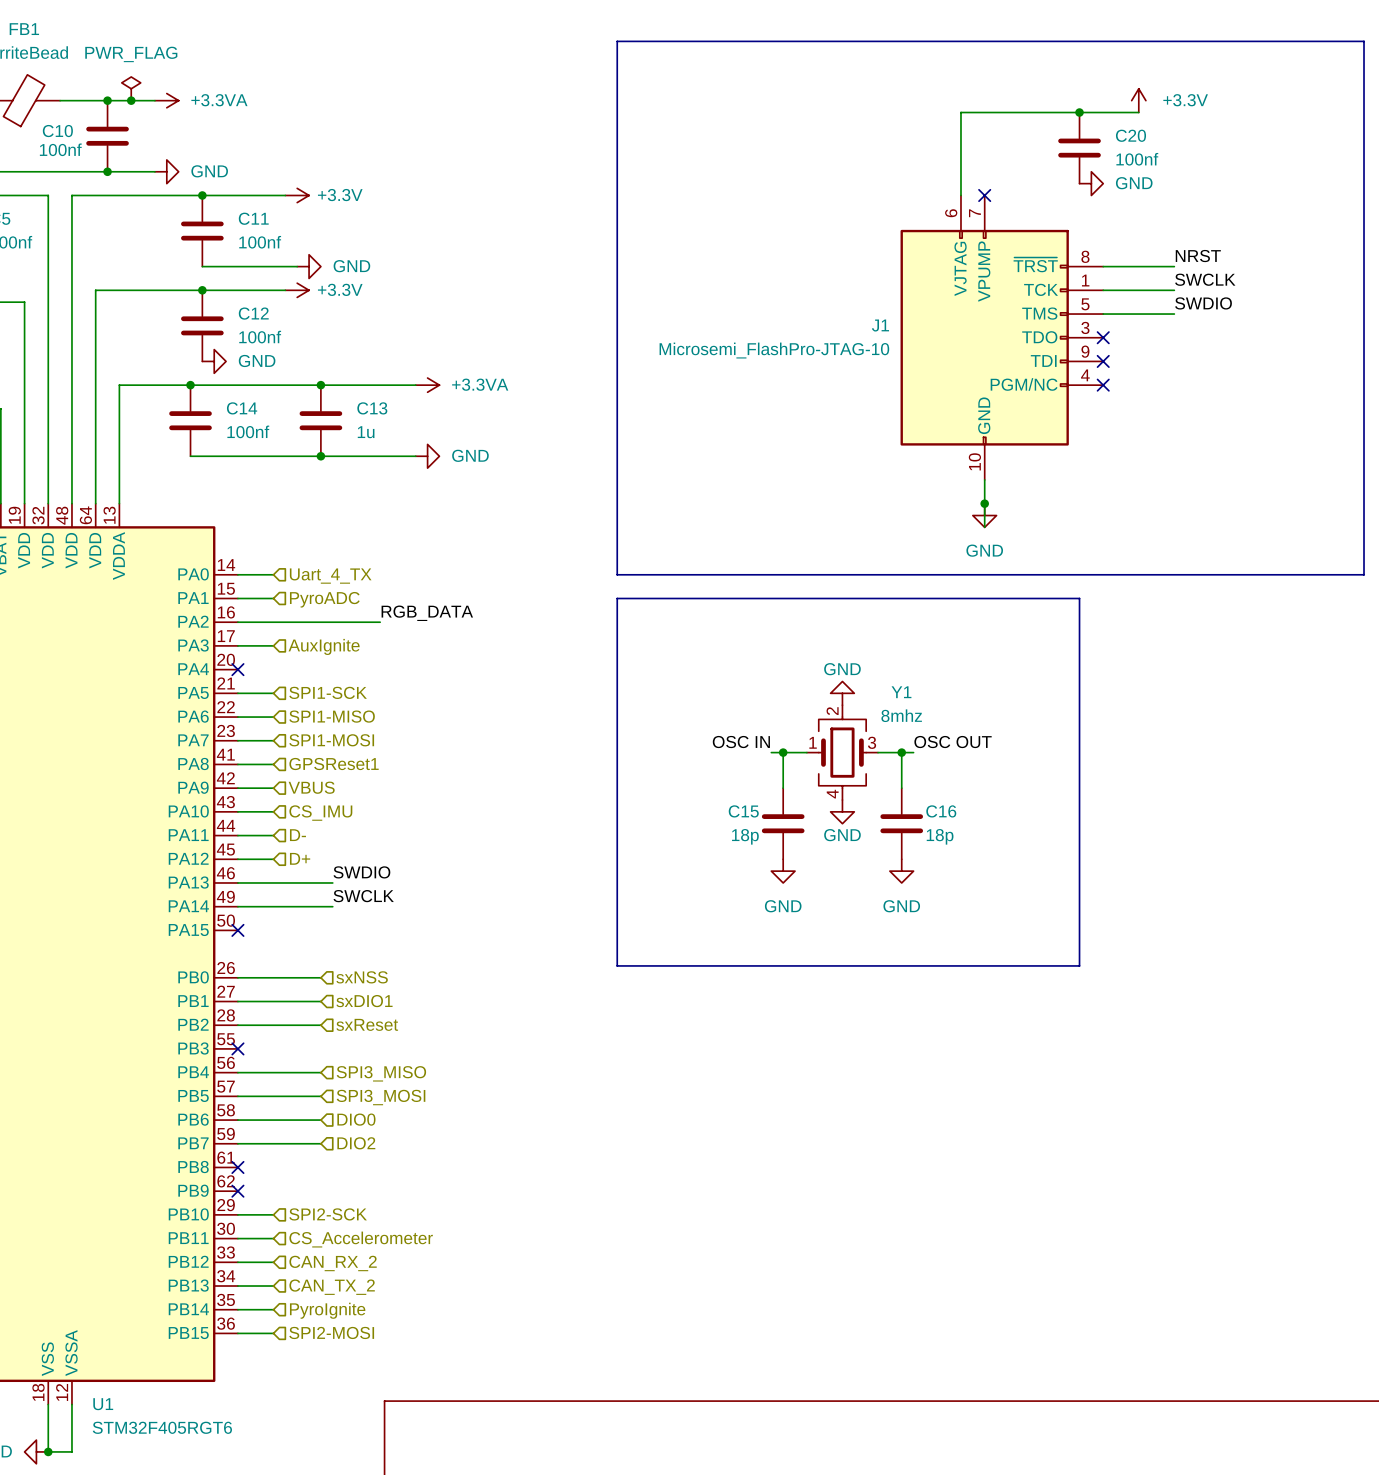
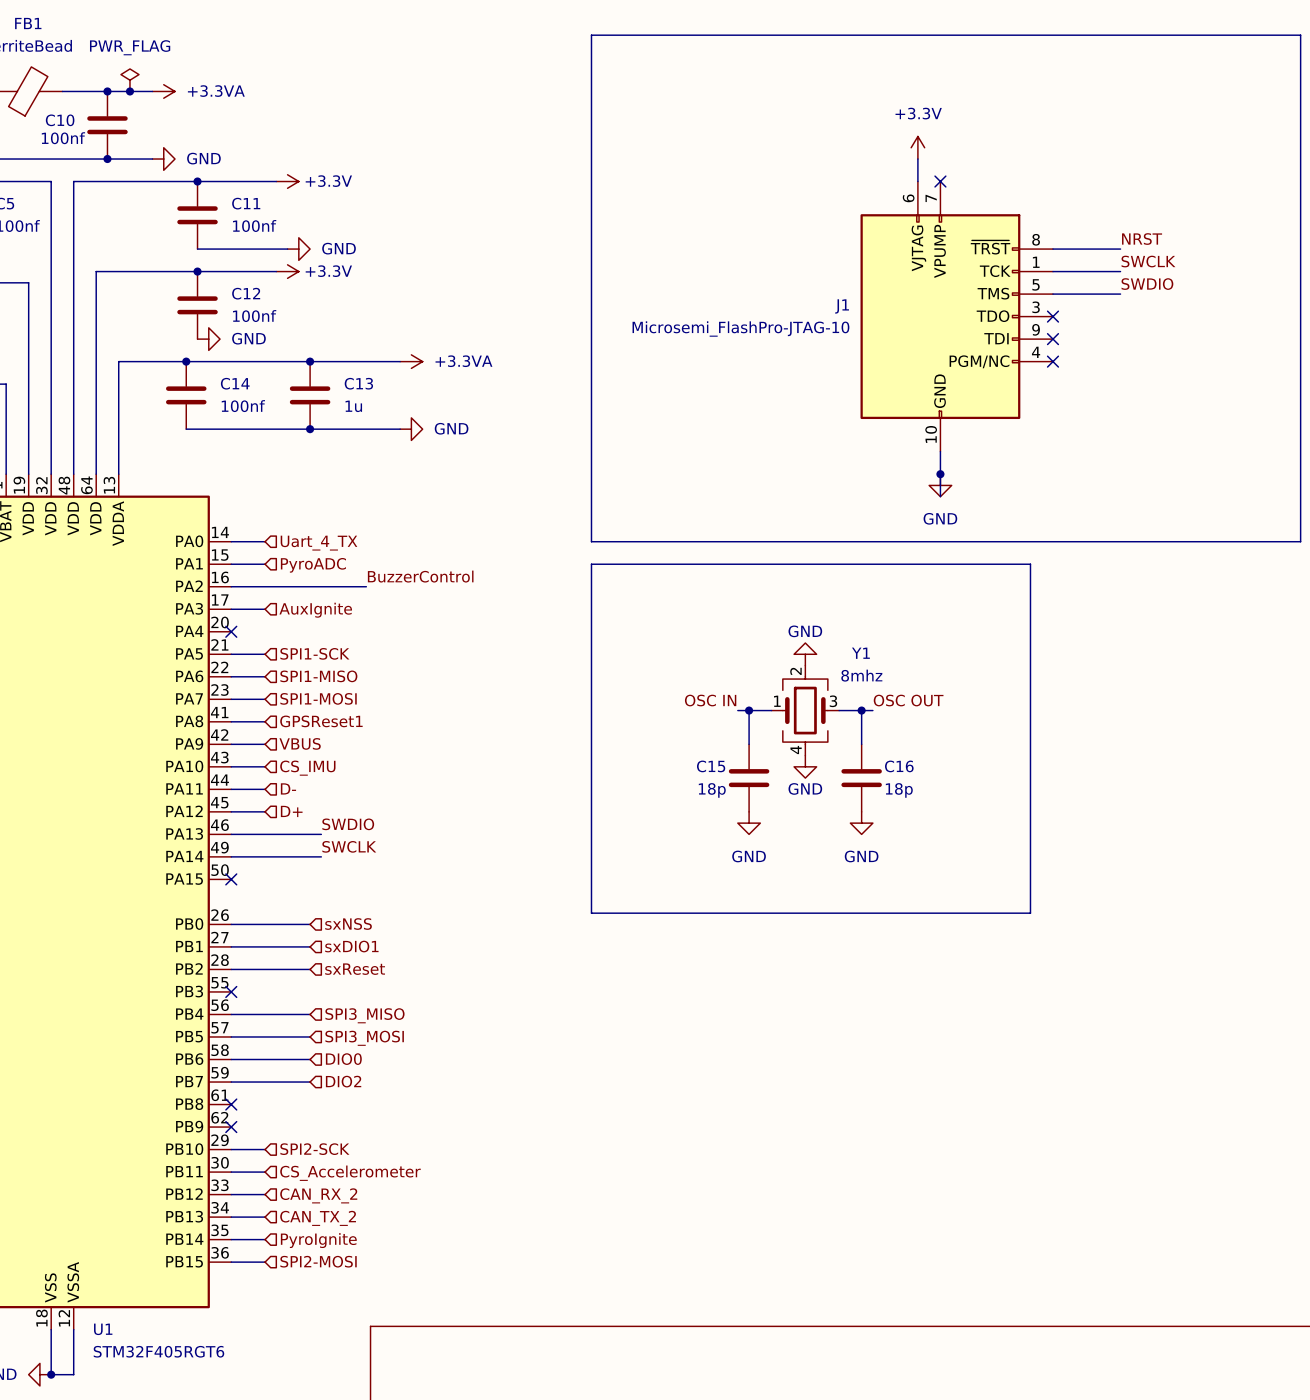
power symbol position: +3.3V (1138, 100) -> +3.3V (917, 147)
power symbol text position: +3.3V (1185, 100) -> +3.3V (918, 113)
junction: (1079, 112) -> none
wire: (1138, 112) (960, 112) (960, 171) -> none
C20: 100nf (1079, 148) -> none
power symbol: GND (1091, 183) -> none
label: RGB_DATA (427, 613) -> BuzzerControl (420, 576)

